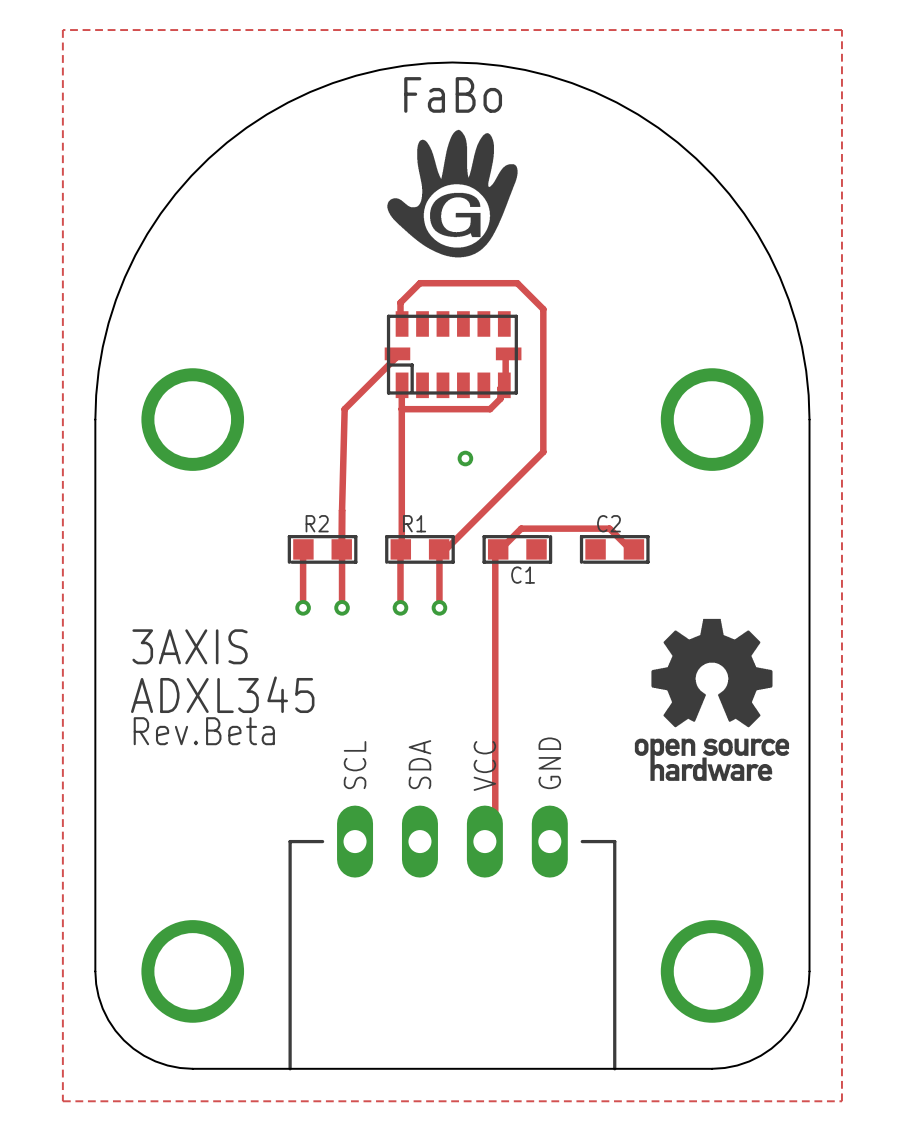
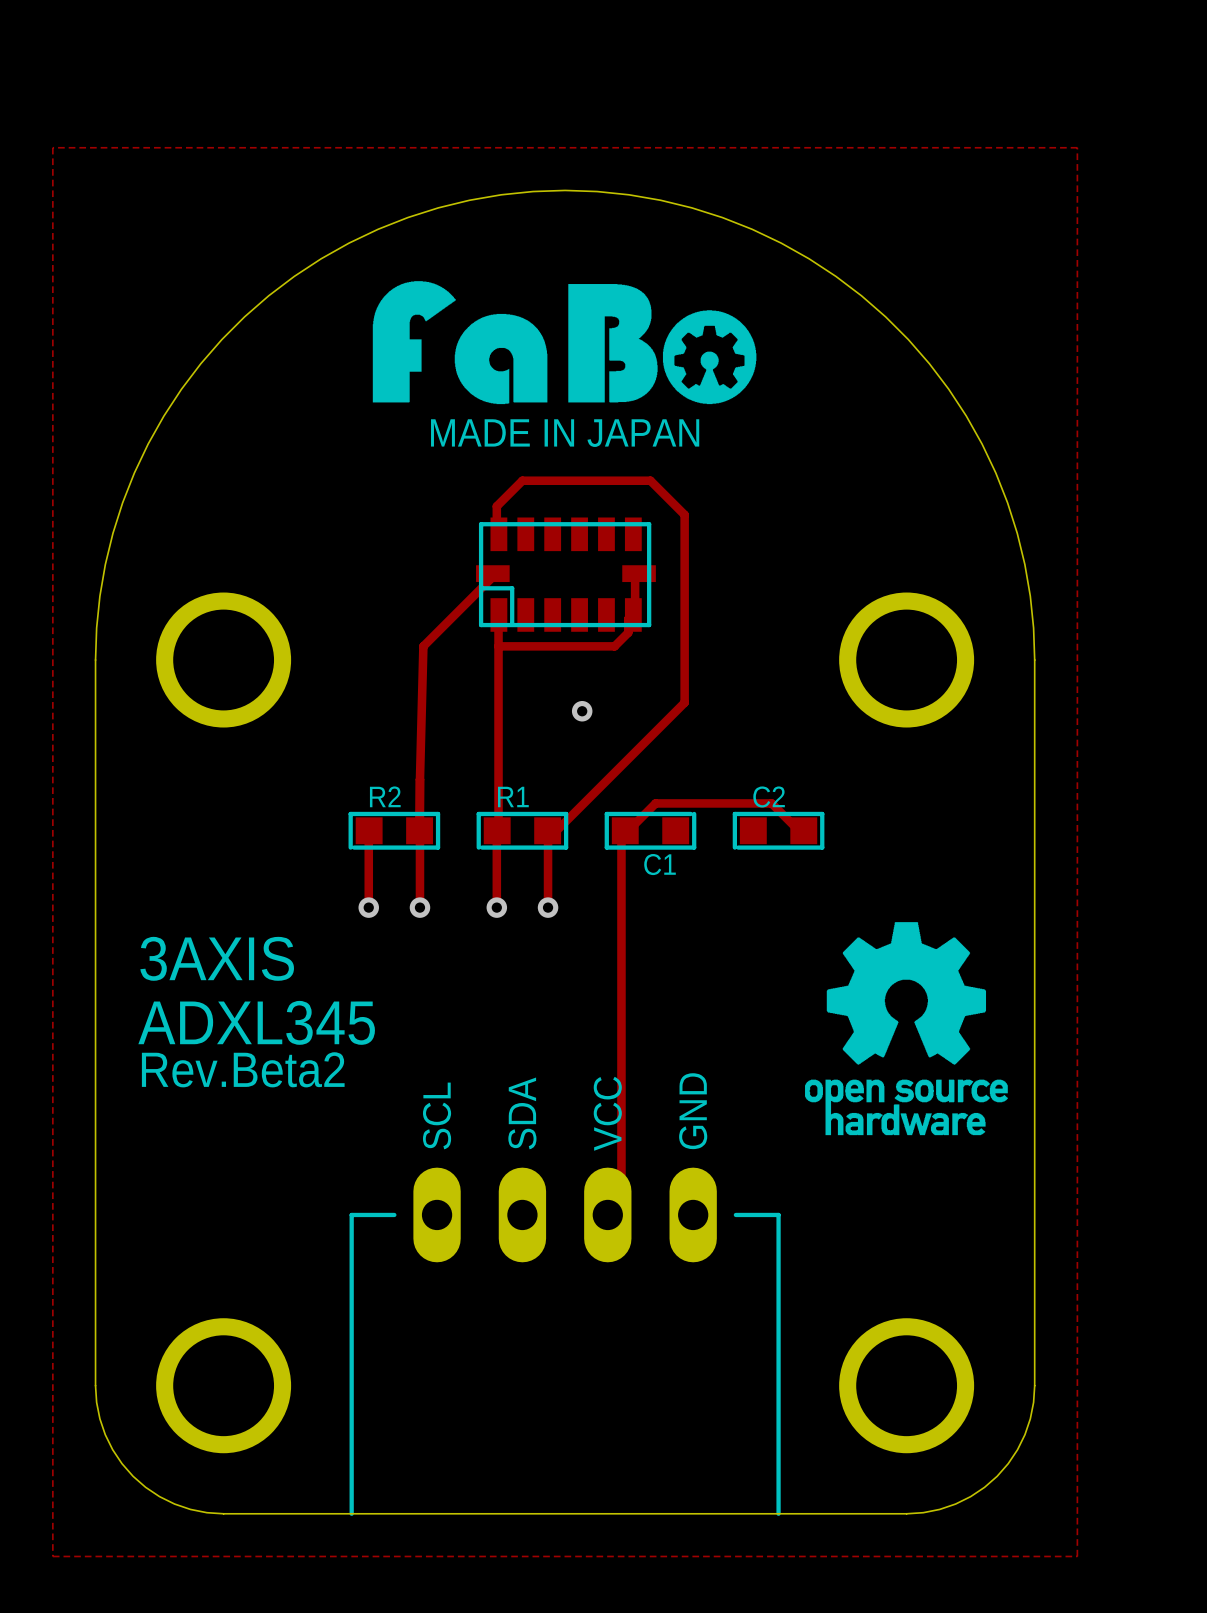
drawing shape: [387, 77, 518, 258] -> [372, 281, 757, 405]
text: none -> MADE IN JAPAN (565, 433)
text: Rev.Beta (204, 731) -> Rev.Beta2 (243, 1069)

